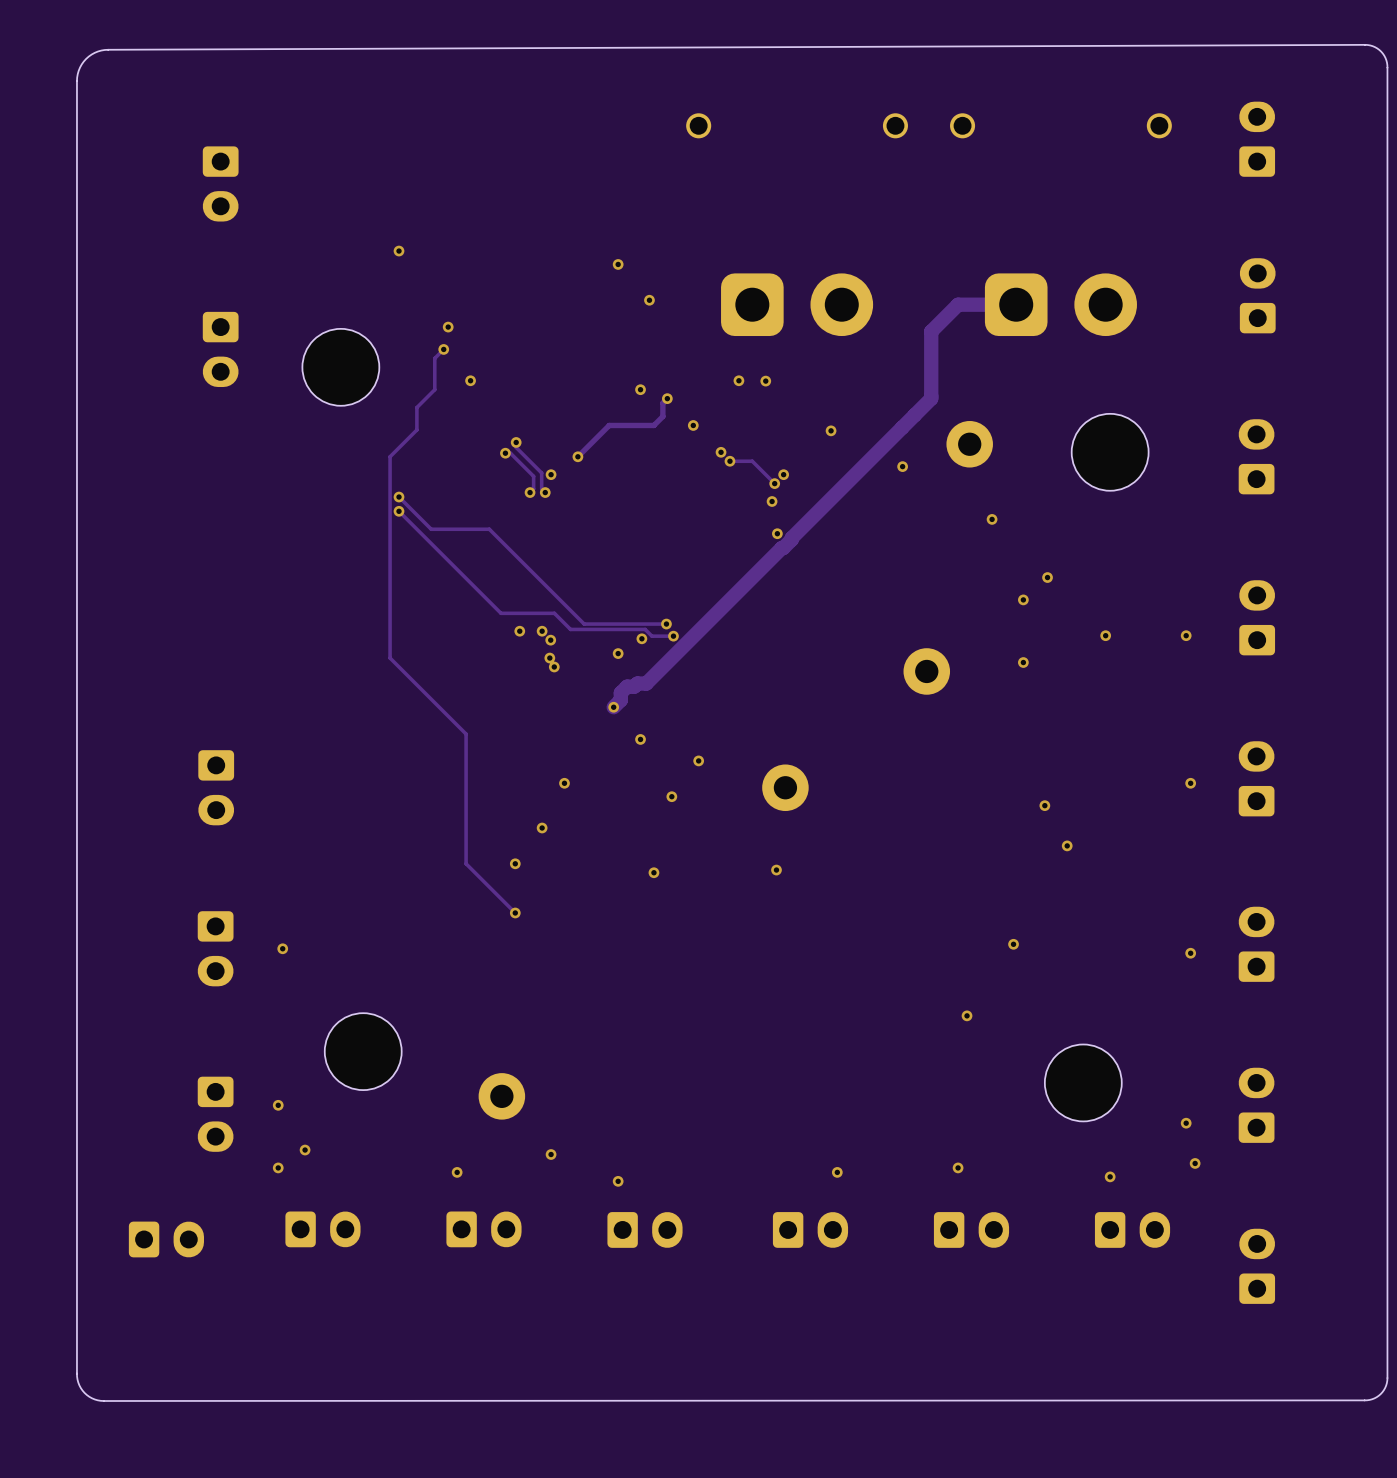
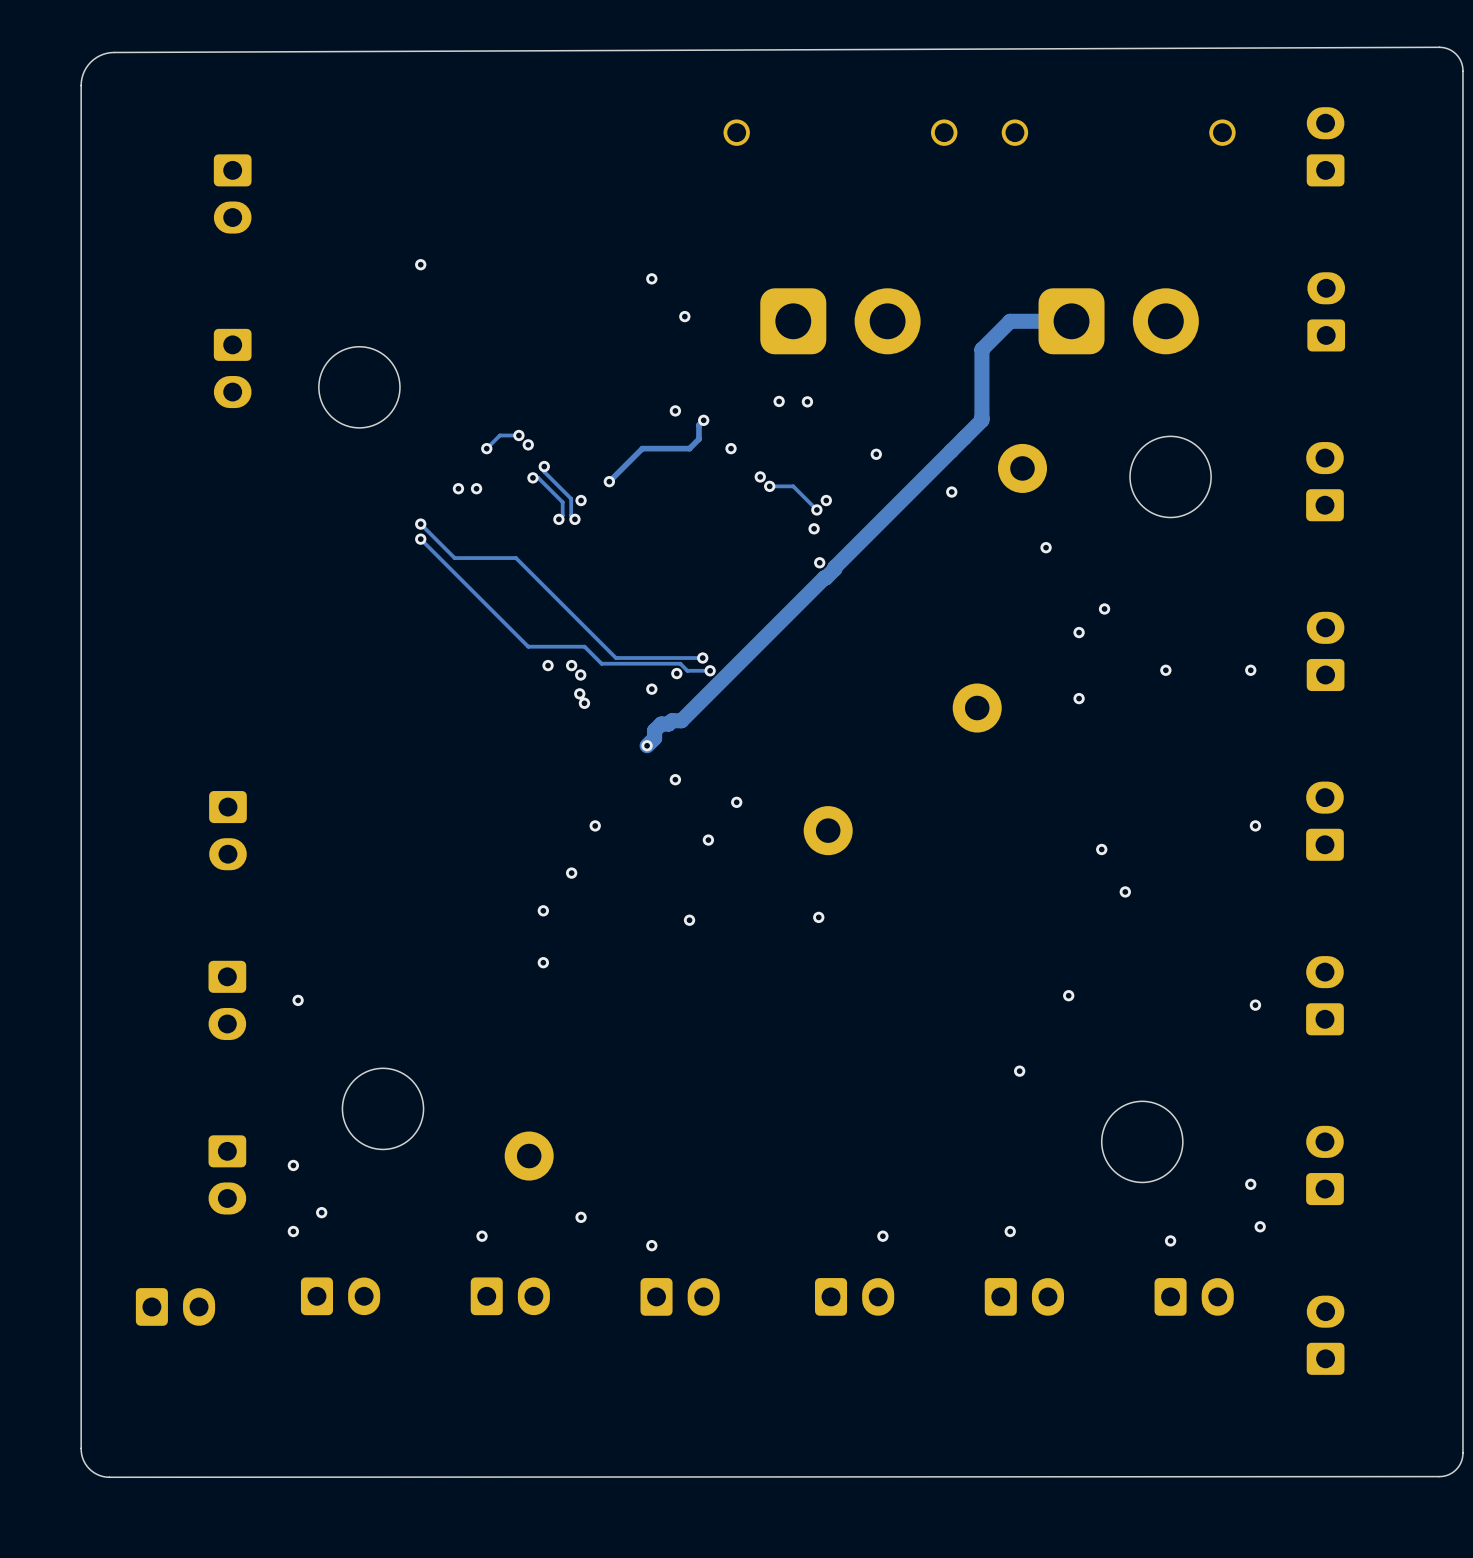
via: (448, 327) -> none
track: (443, 349) (434, 358) (434, 389) (416, 407) (416, 429) (390, 456) (390, 658) (466, 734) (466, 863) (515, 912) -> none
via: (443, 349) -> none
via: (470, 380) -> none
track: none -> (518, 435) (499, 435) (486, 448)
via: none -> (518, 435)
via: none -> (528, 444)
via: none -> (486, 448)
via: none -> (458, 488)
via: none -> (476, 488)

